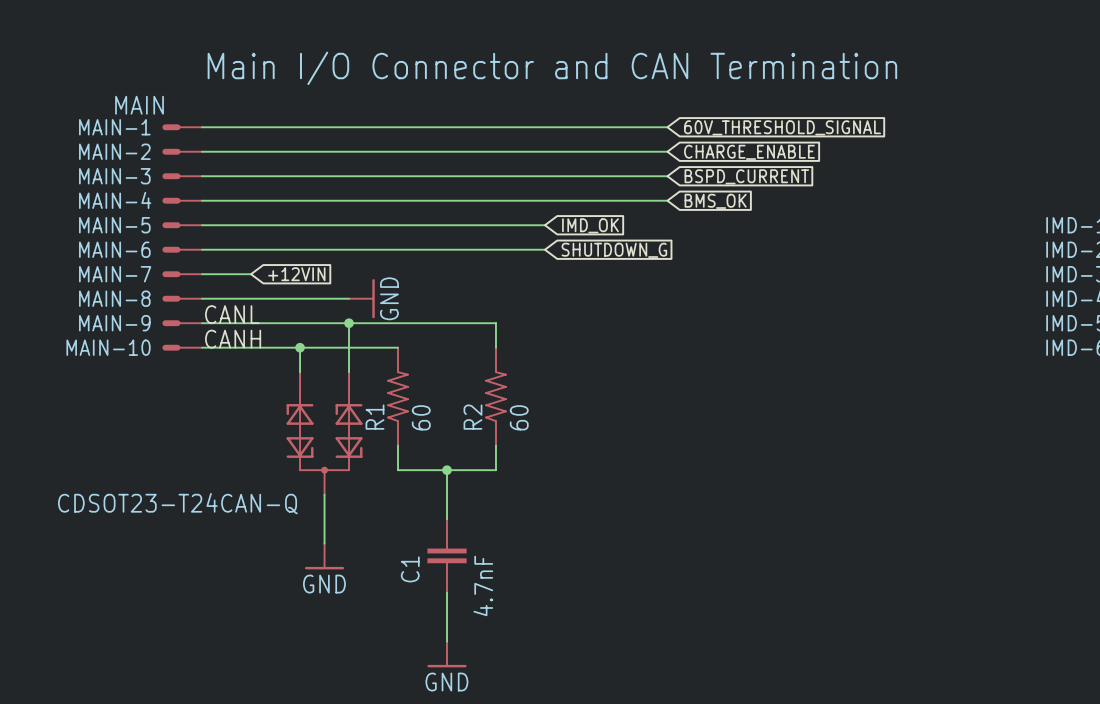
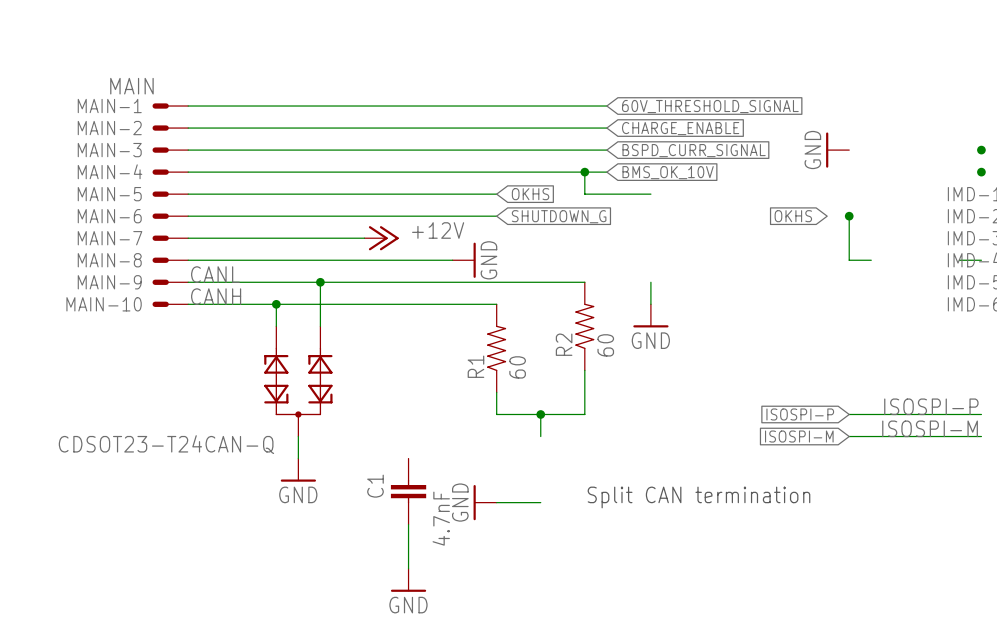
text: Main I/O Connector and CAN Termination (552, 68) -> none
global label: BSPD_CURRENT (746, 176) -> BSPD_CURR_SIGNAL (694, 150)
power symbol: none -> GND (837, 150)
junction: none -> (981, 150)
wire: none -> (584, 172) (584, 194) (650, 194)
junction: none -> (584, 172)
junction: none -> (981, 172)
global label: BMS_OK (715, 201) -> BMS_OK_10V (668, 172)
global label: IMD_OK (590, 225) -> OKHS (530, 194)
global label: none -> OKHS (793, 216)
wire: none -> (849, 216) (849, 260) (871, 260)
junction: none -> (849, 216)
wire: none -> (232, 238) (364, 238)
global label: +12VIN (296, 274) -> none
power symbol: none -> +12V (381, 238)
wire: none -> (320, 260) (452, 260)
power symbol: GND (361, 298) -> none
power symbol: none -> GND (464, 260)
wire: none -> (959, 260) (981, 260)
wire: (495, 323) (495, 347) -> (452, 282) (584, 282)
wire: none -> (650, 282) (650, 304)
wire: none -> (364, 304) (496, 304)
power symbol: none -> GND (650, 315)
R1 position: (398, 396) -> (496, 348)
R2 position: (495, 396) -> (584, 326)
wire: none -> (584, 370) (584, 414) (496, 414) (496, 392)
wire: (398, 445) (398, 470) (495, 470) (495, 445) -> none
label: none -> ISOSPI-P (931, 406)
wire: (447, 470) (447, 519) -> none
junction: (447, 470) -> none
wire: none -> (540, 414) (540, 436)
junction: none -> (540, 414)
global label: none -> ISOSPI-P (800, 414)
wire: none -> (849, 414) (981, 414)
label: none -> ISOSPI-M (930, 428)
global label: none -> ISOSPI-M (799, 436)
wire: none -> (849, 436) (981, 436)
power symbol position: GND (324, 556) -> GND (298, 470)
text: none -> Split CAN termination (698, 497)
power symbol: none -> GND (485, 502)
wire: none -> (496, 502) (540, 502)
C1 name position: C1 (410, 569) -> C1 (375, 486)

